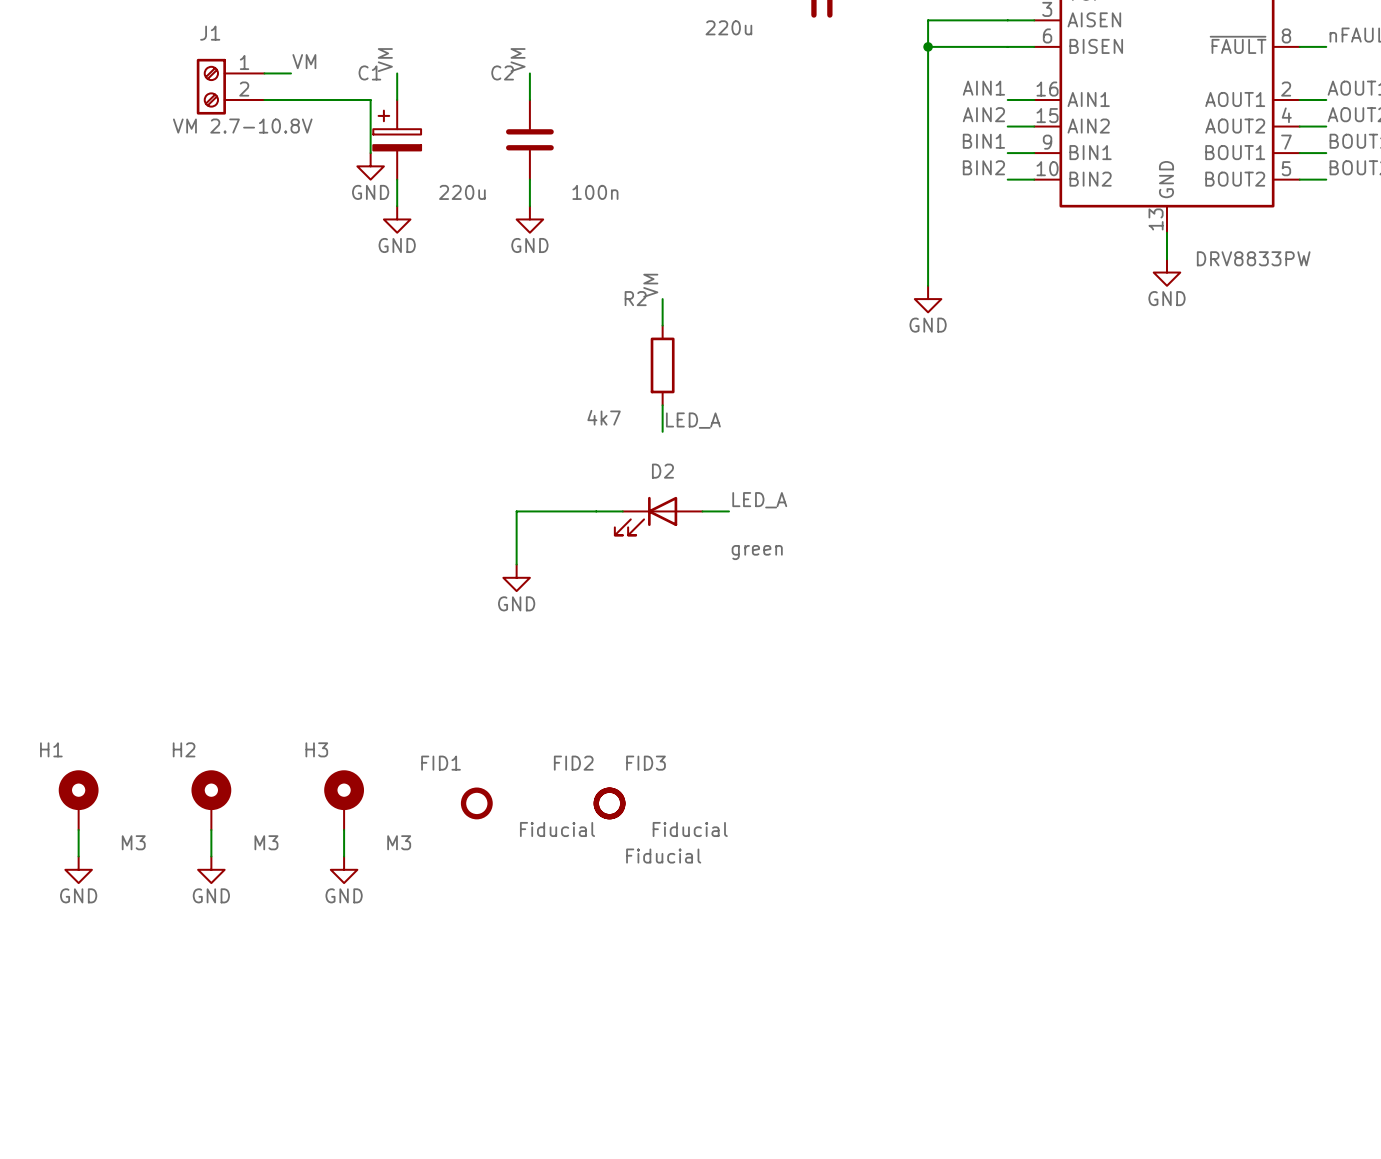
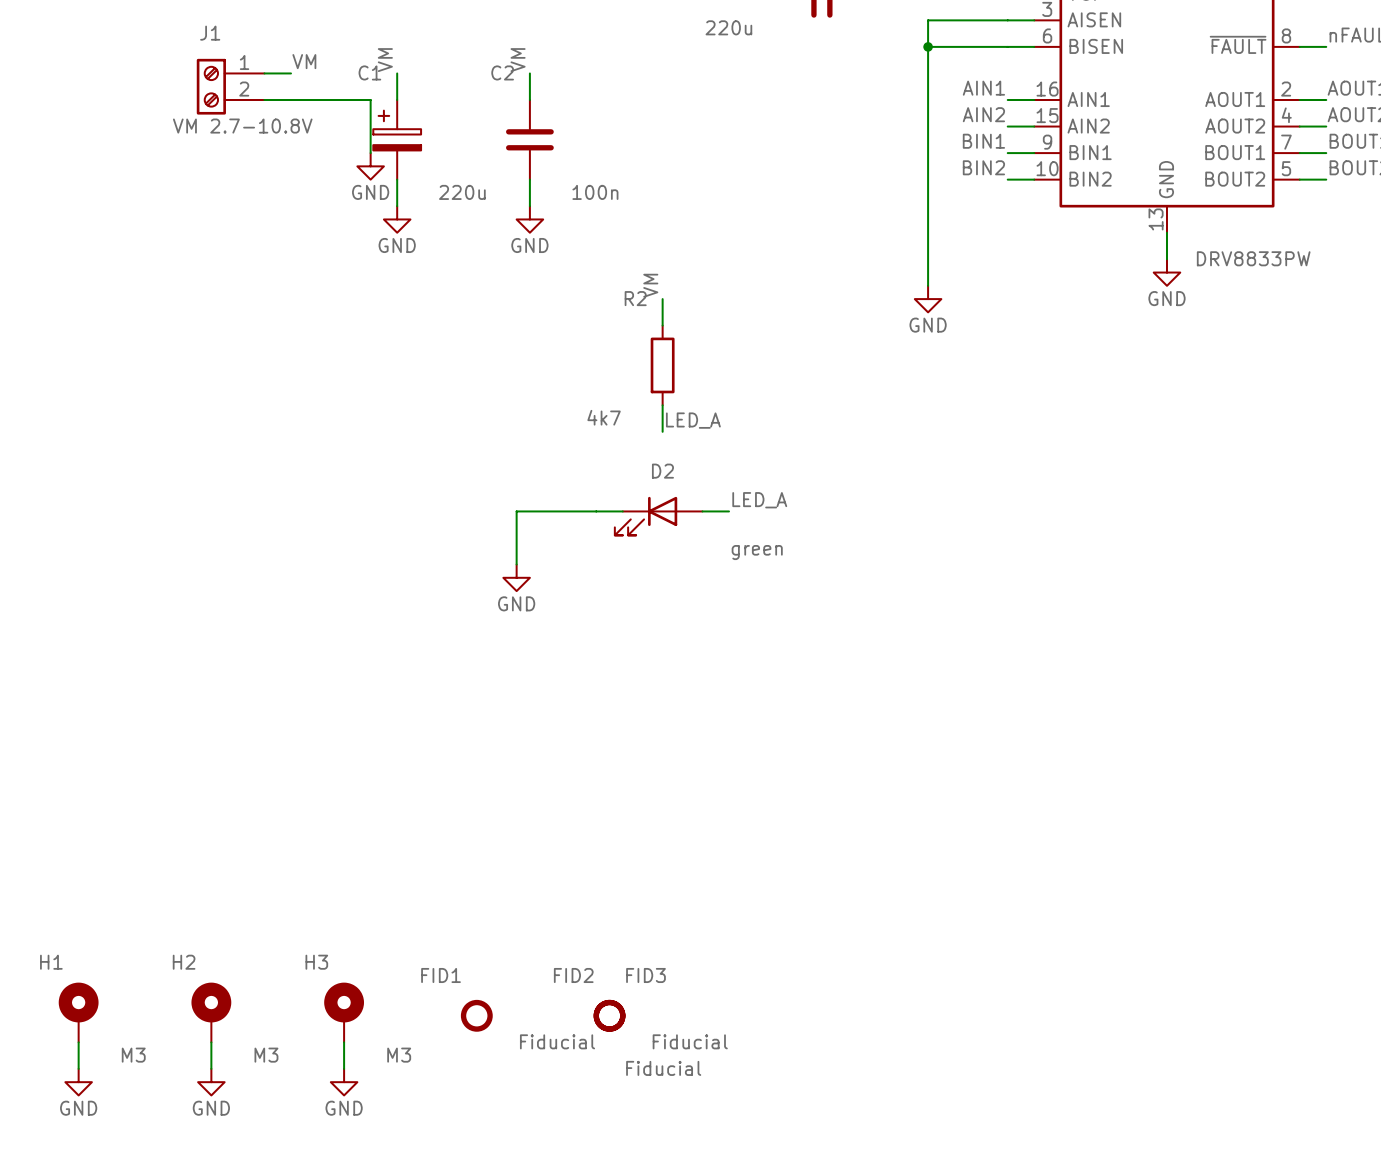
H1 position: (78, 800) -> (78, 1012)
H2 position: (211, 800) -> (211, 1012)
H3 position: (344, 800) -> (344, 1012)
FID1 position: (476, 803) -> (476, 1015)
FID2 position: (609, 803) -> (609, 1015)
FID3 position: (609, 803) -> (609, 1015)
wire: (78, 829) (78, 856) -> (78, 1042) (78, 1068)
wire: (211, 829) (211, 856) -> (211, 1042) (211, 1068)
wire: (344, 829) (344, 856) -> (344, 1042) (344, 1068)
power symbol: GND (78, 869) -> none
power symbol: GND (211, 869) -> none
power symbol: GND (344, 869) -> none
power symbol: none -> GND (78, 1082)
power symbol: none -> GND (211, 1082)
power symbol: none -> GND (344, 1082)

